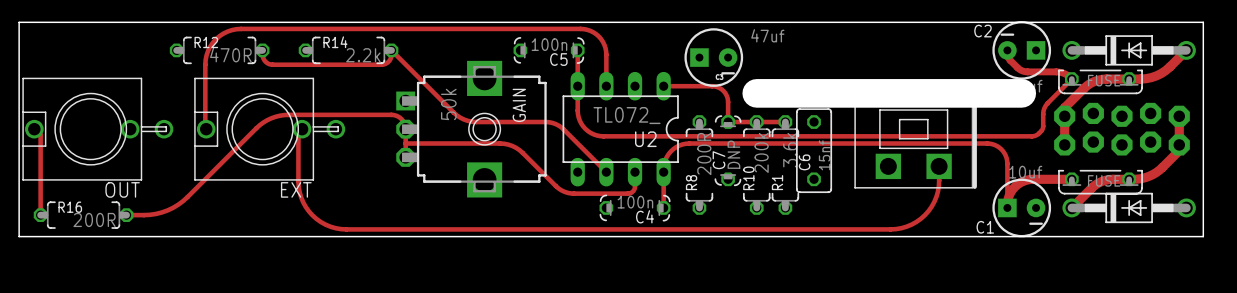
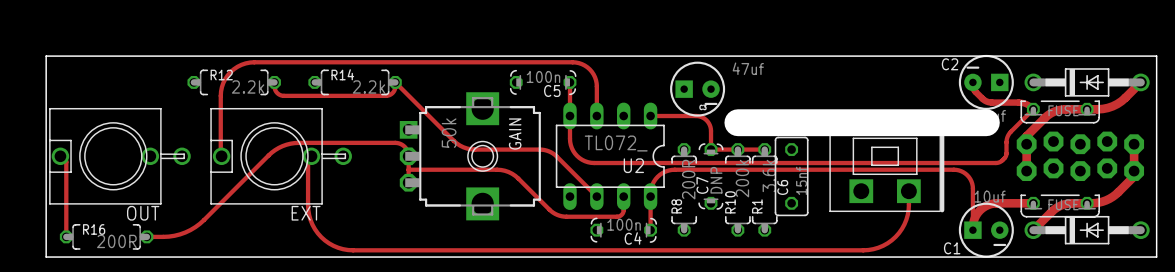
R12 value: 470R (230, 54) -> 2.2k (248, 86)

